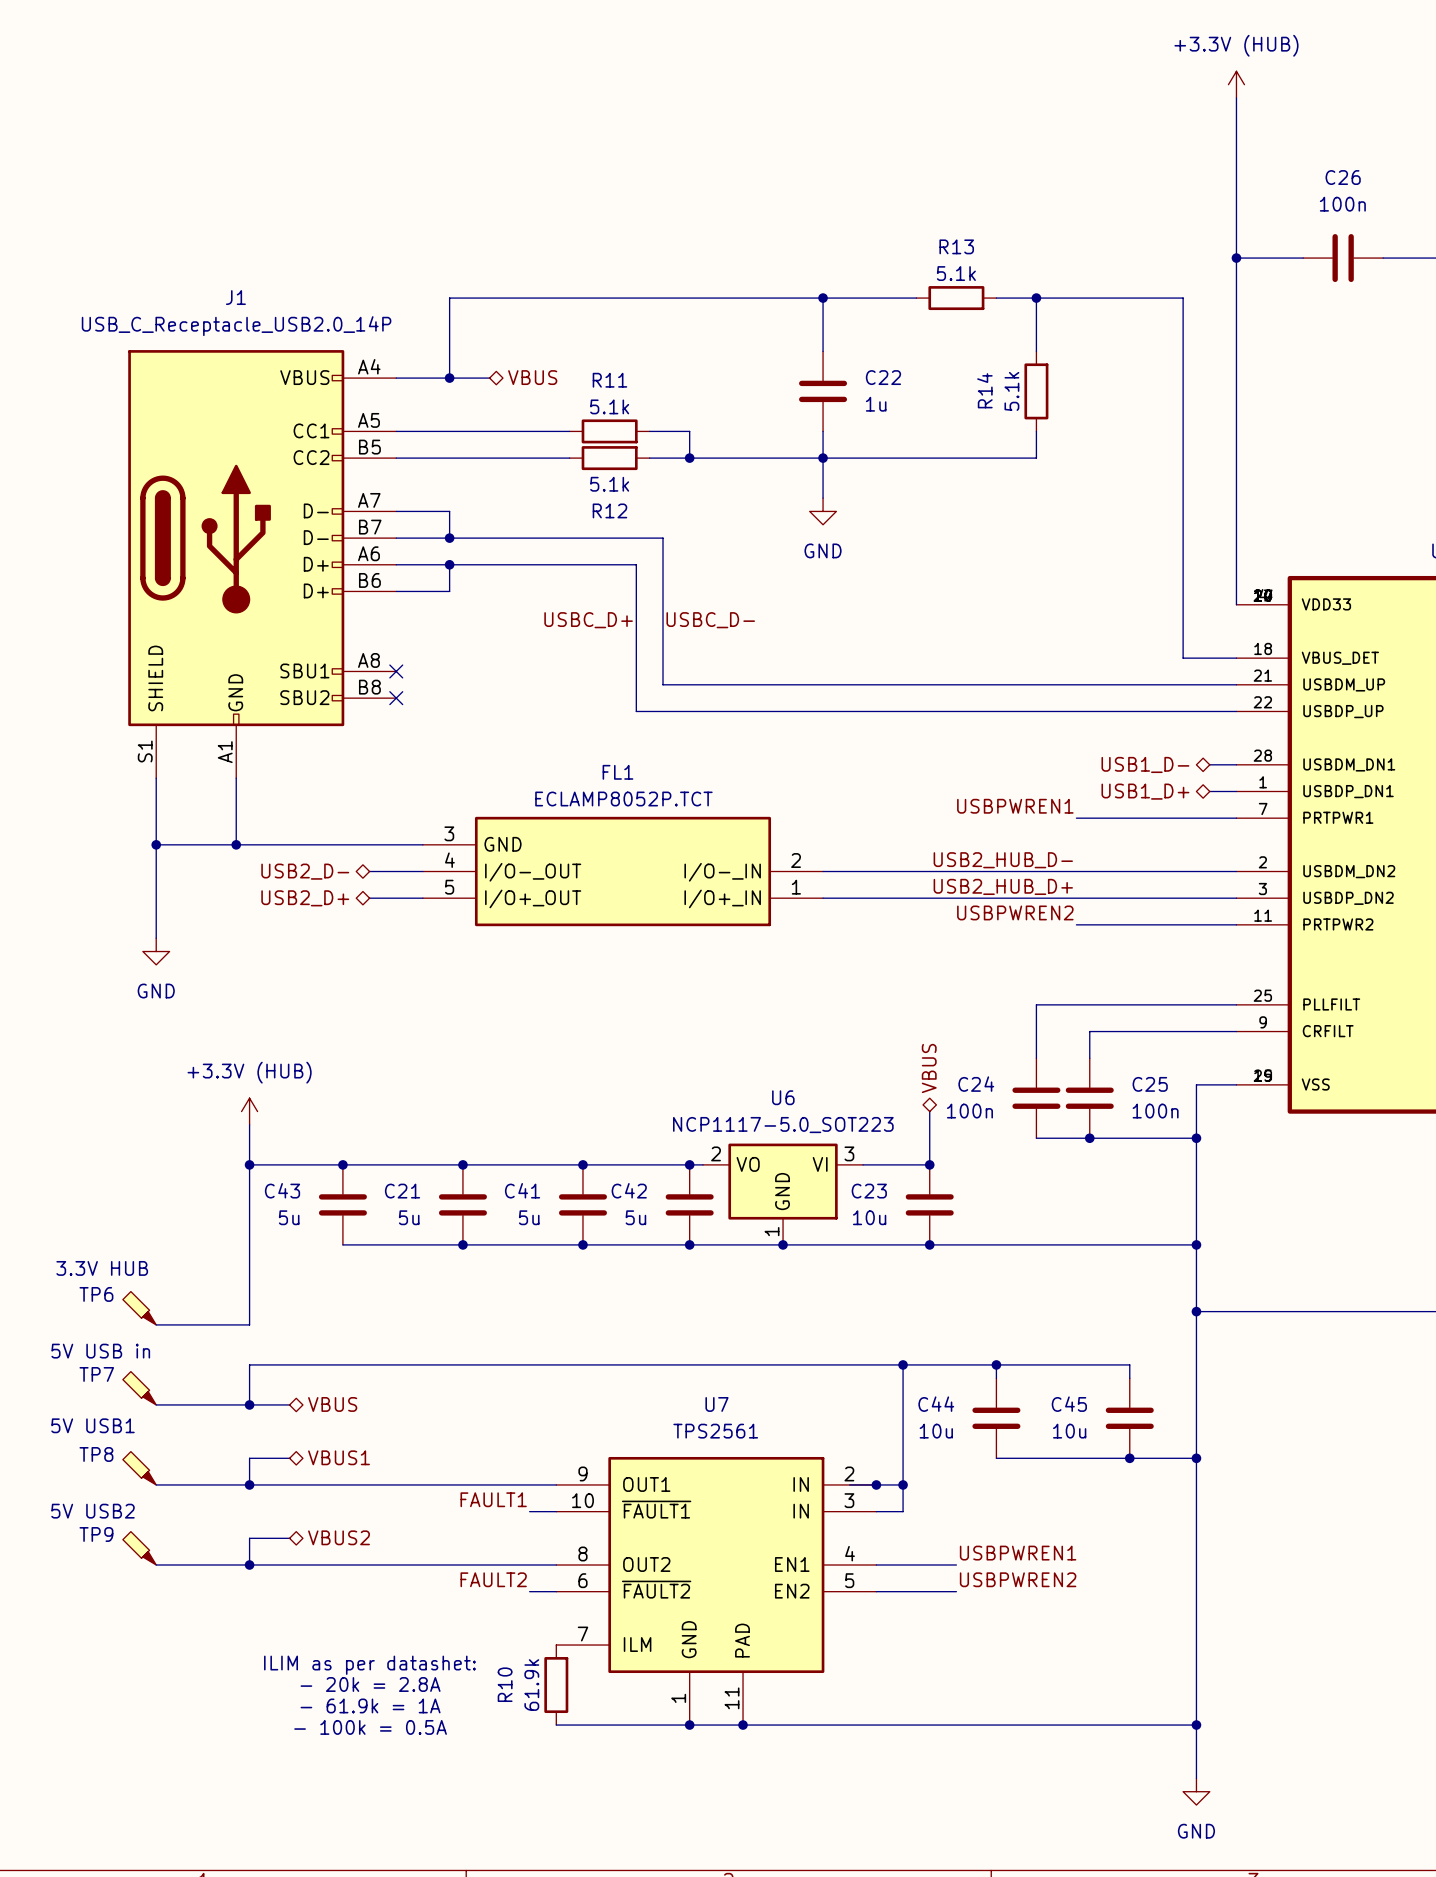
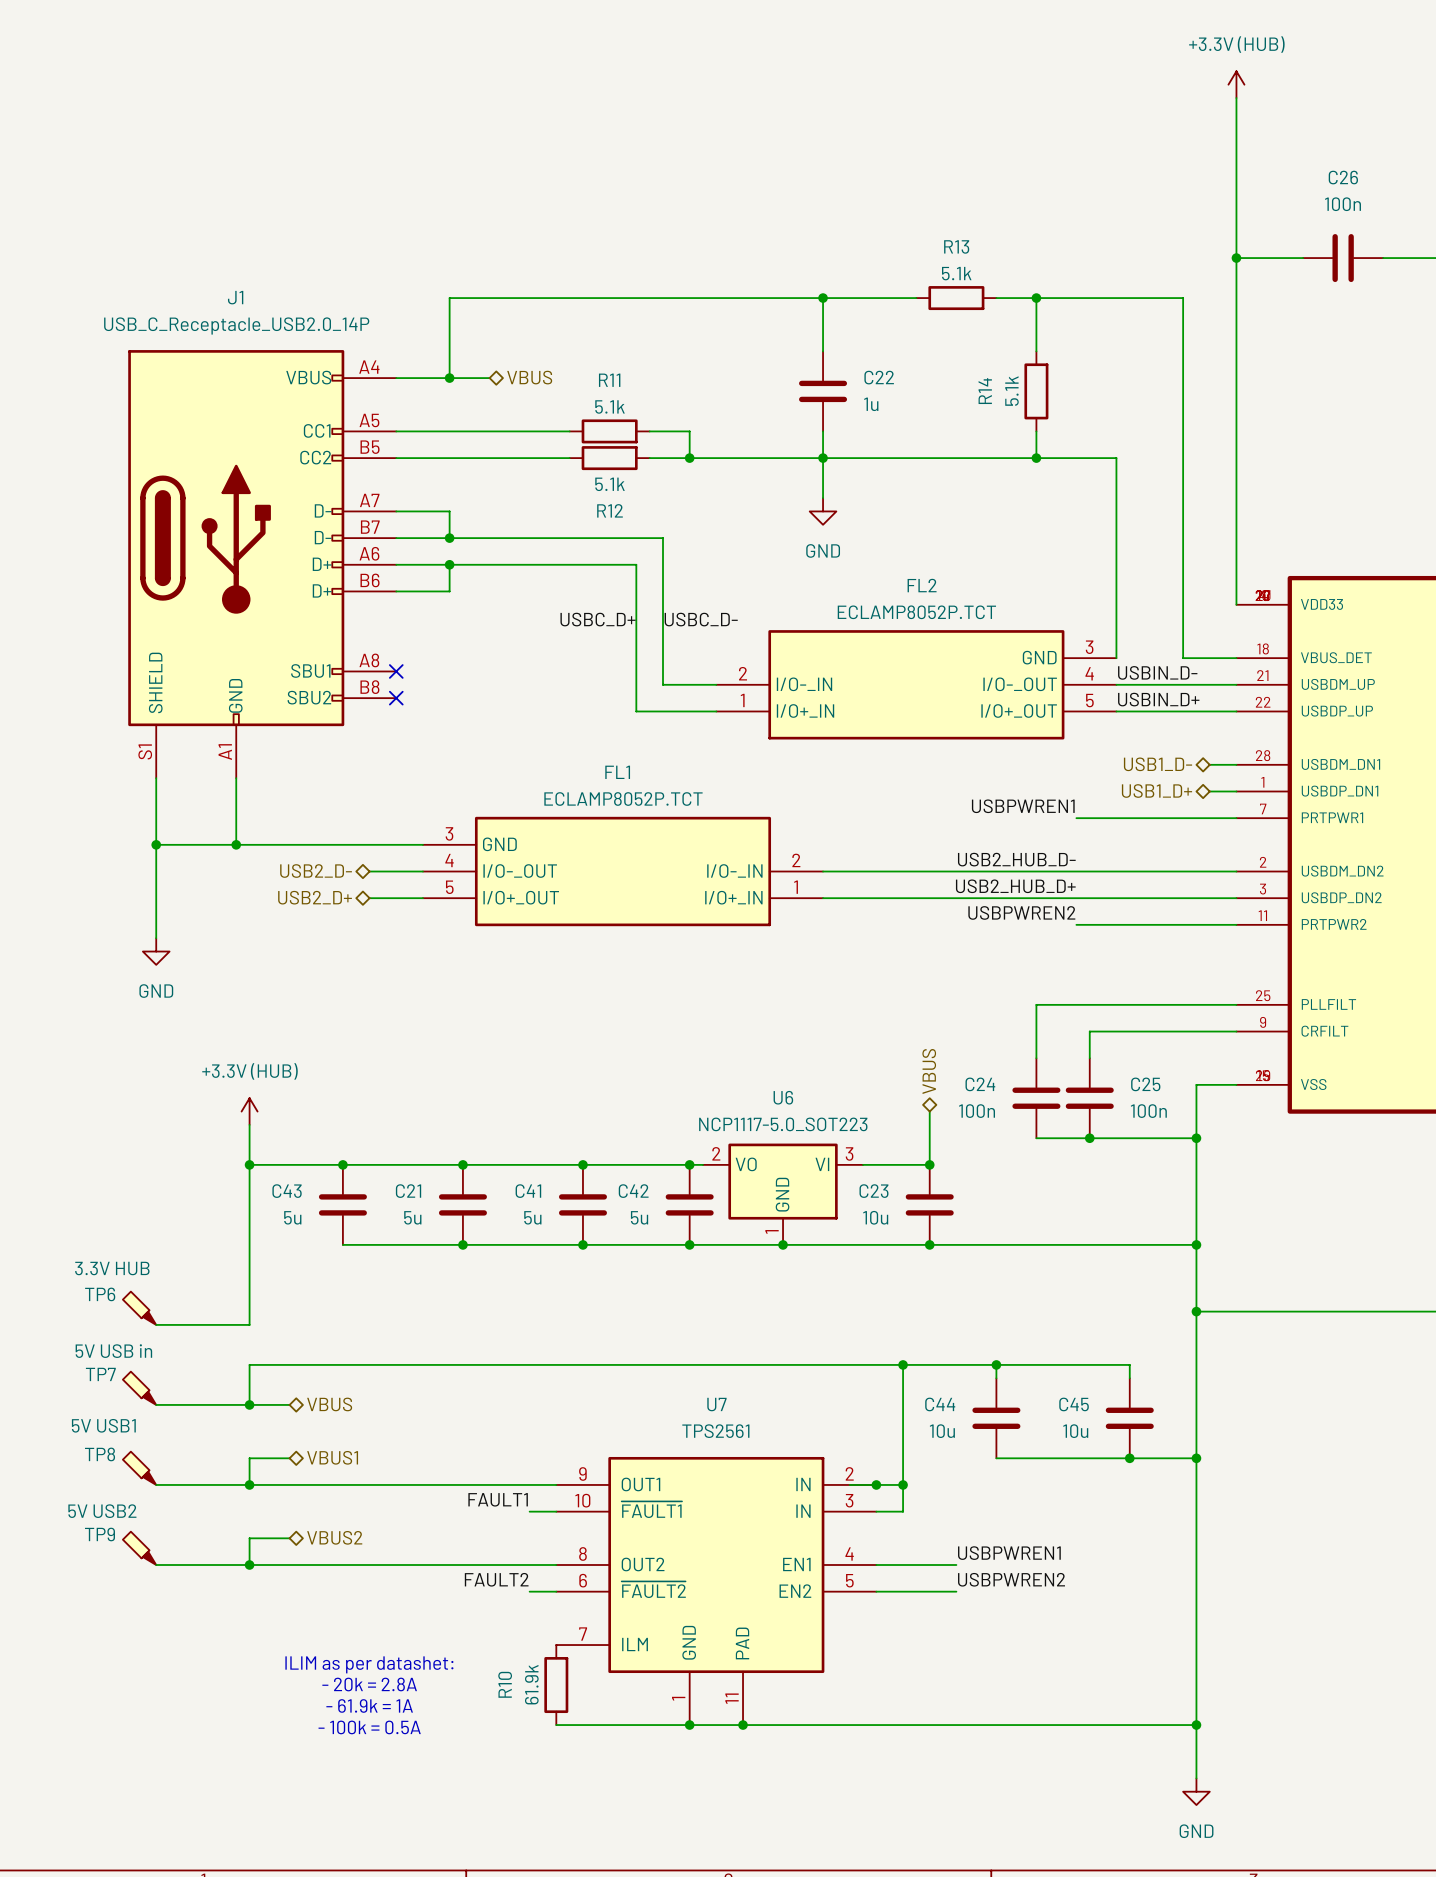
wire: none -> (1036, 458) (1116, 458) (1116, 658)
junction: none -> (1036, 458)
label: none -> USBIN_D- (1157, 672)
FL2: none -> ECLAMP8052P.TCT (916, 684)
label: none -> USBIN_D+ (1158, 699)

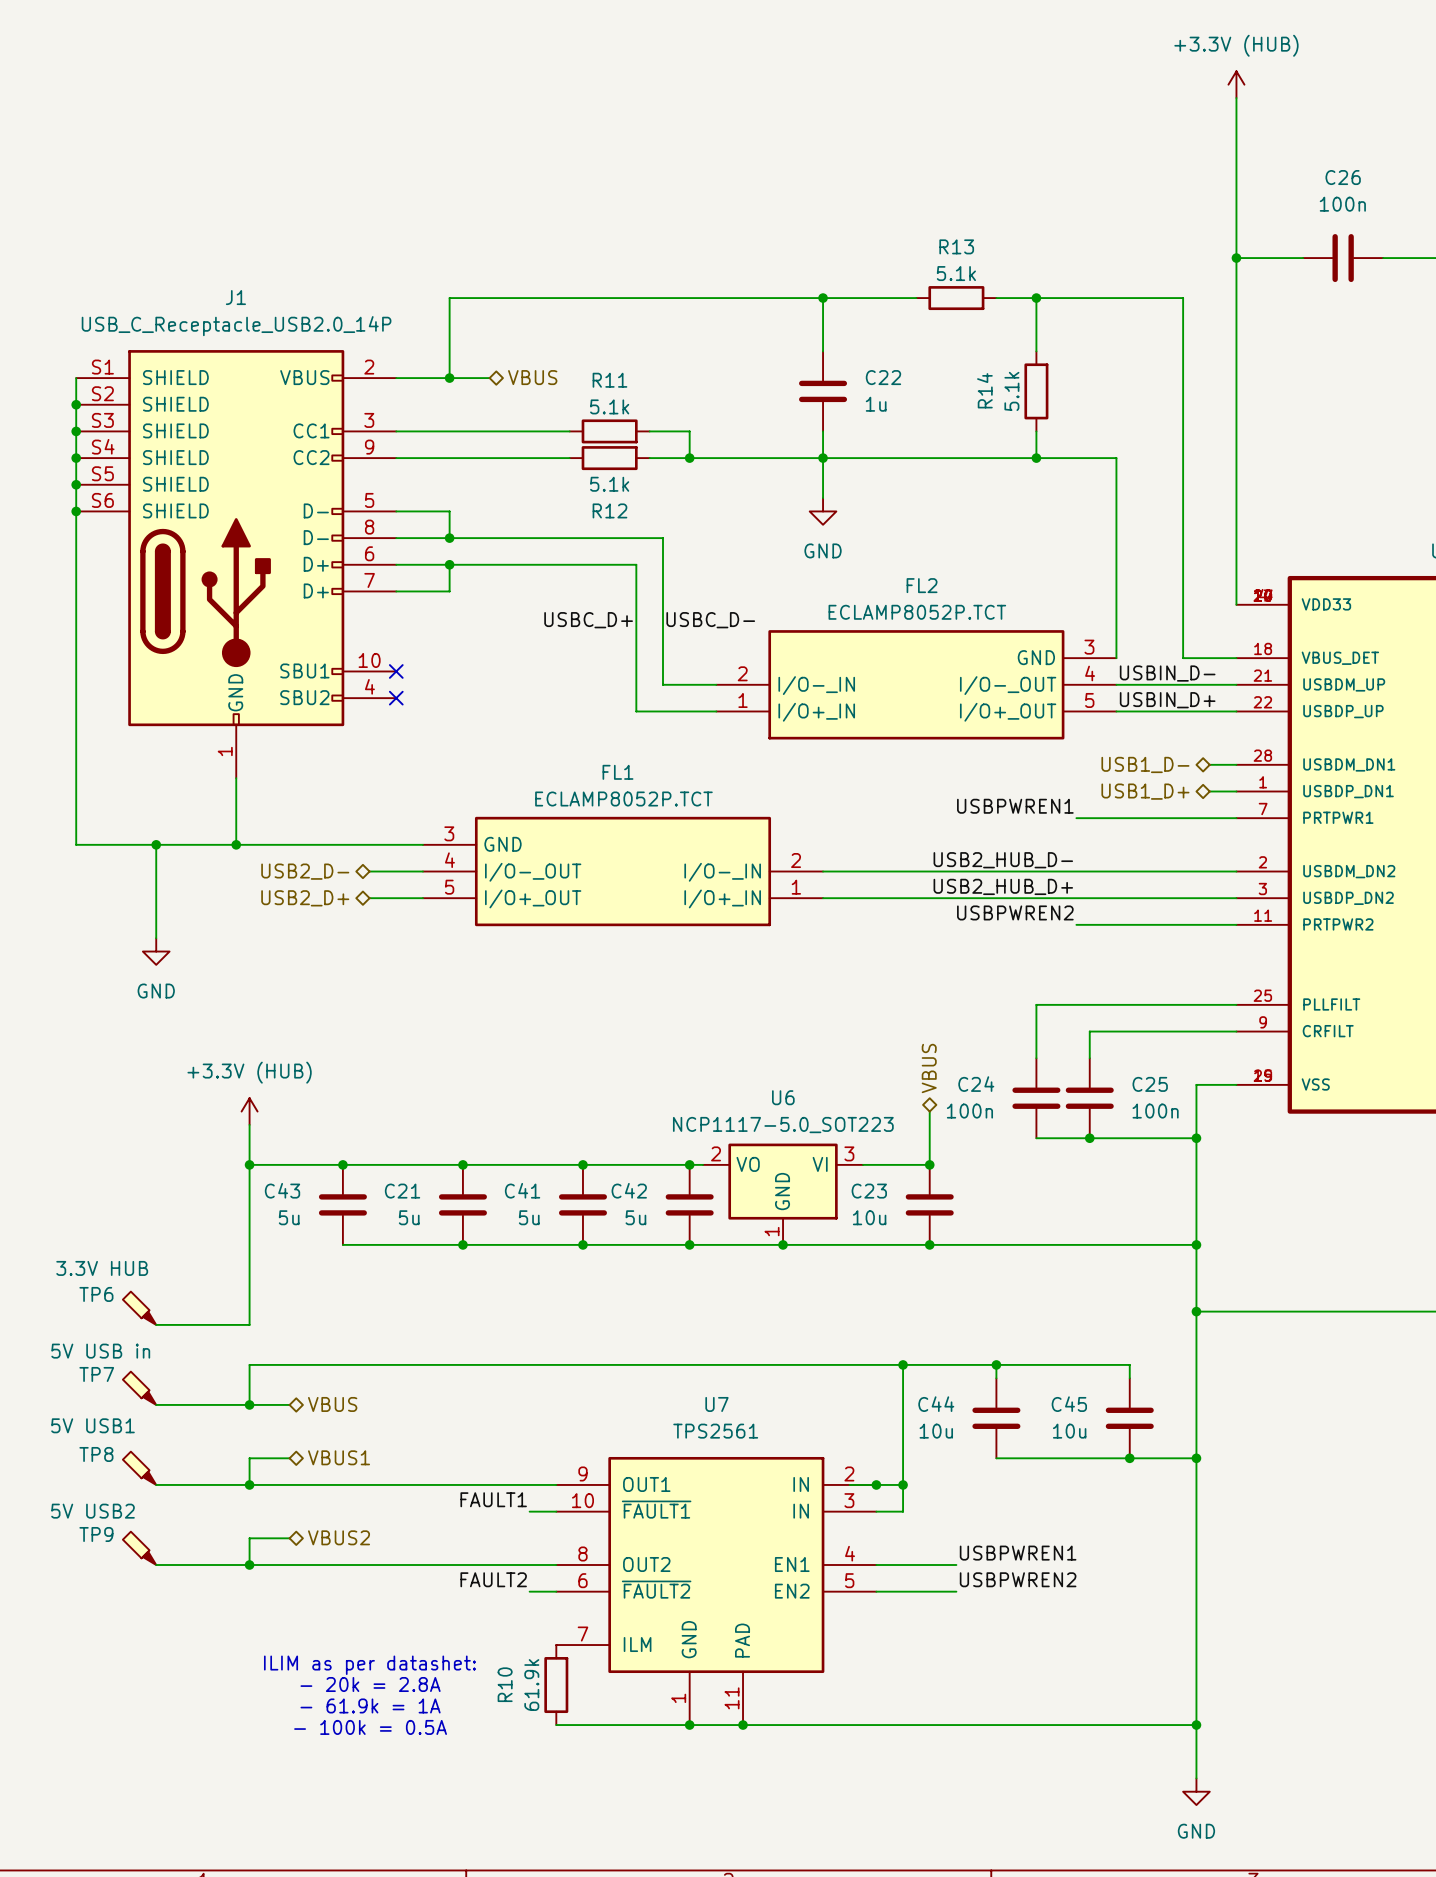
J1 symbol: [128, 350, 397, 779] -> [76, 350, 397, 779]
junction: none -> (76, 404)
junction: none -> (76, 431)
junction: none -> (76, 458)
junction: none -> (76, 484)
junction: none -> (76, 511)
wire: (156, 778) (156, 844) -> (76, 378) (76, 844) (156, 844)

